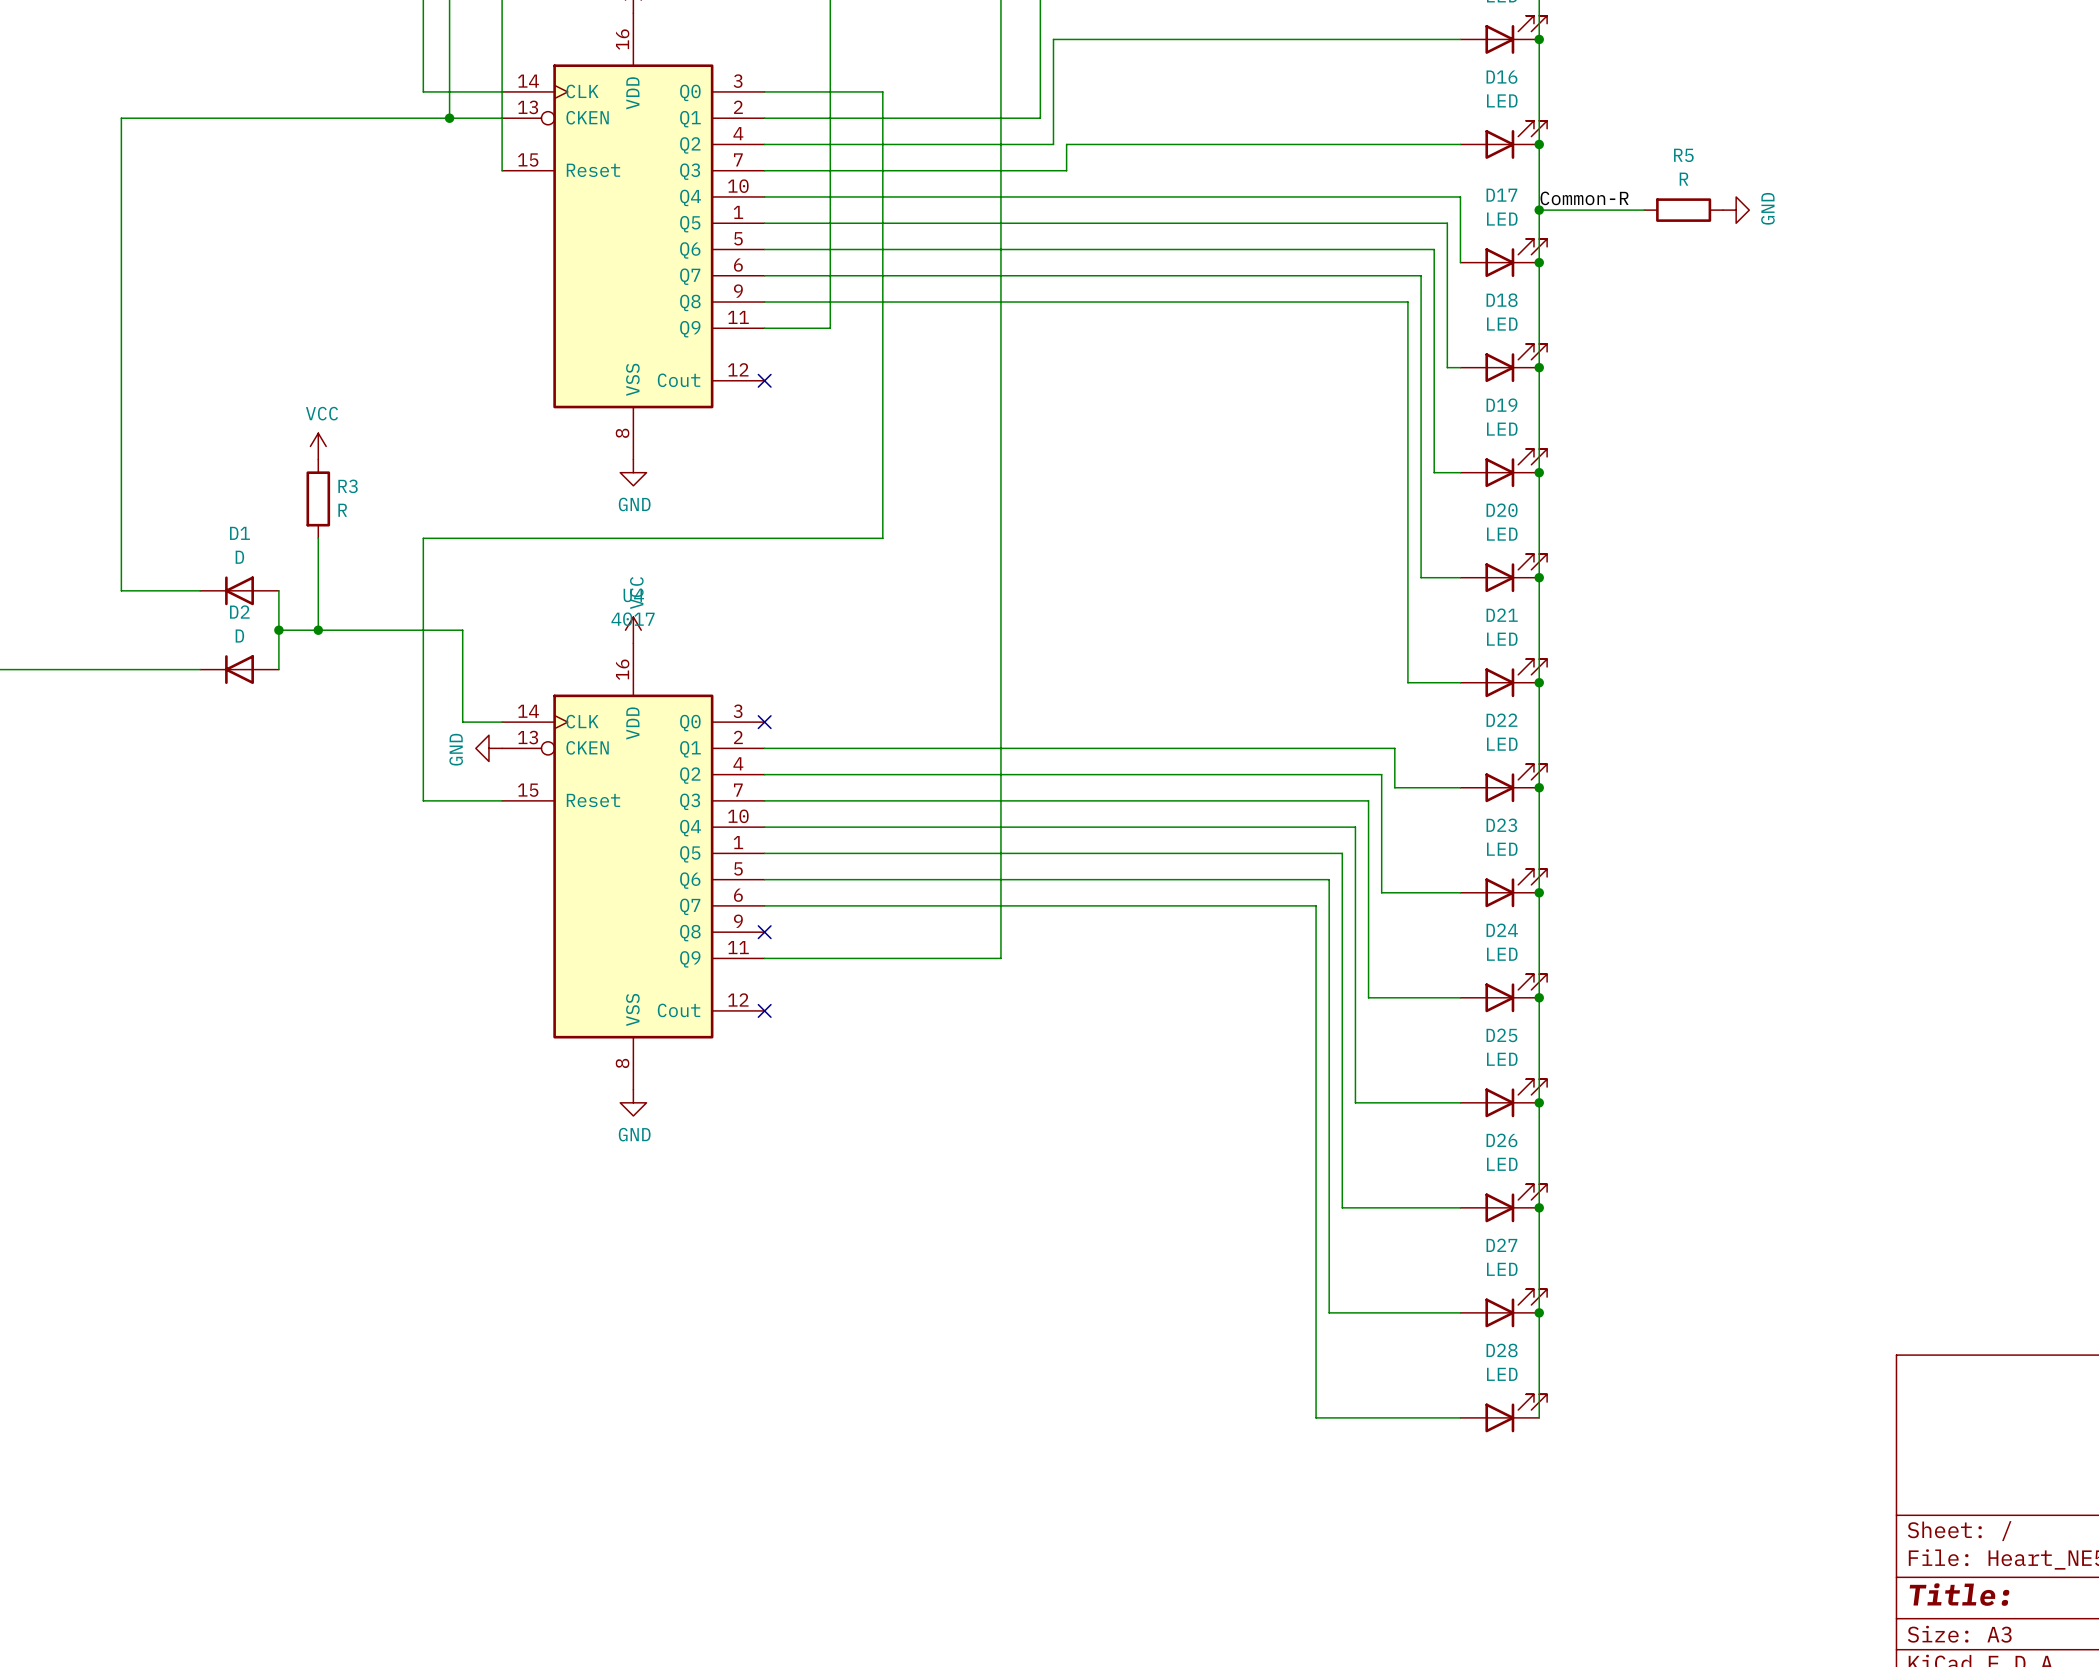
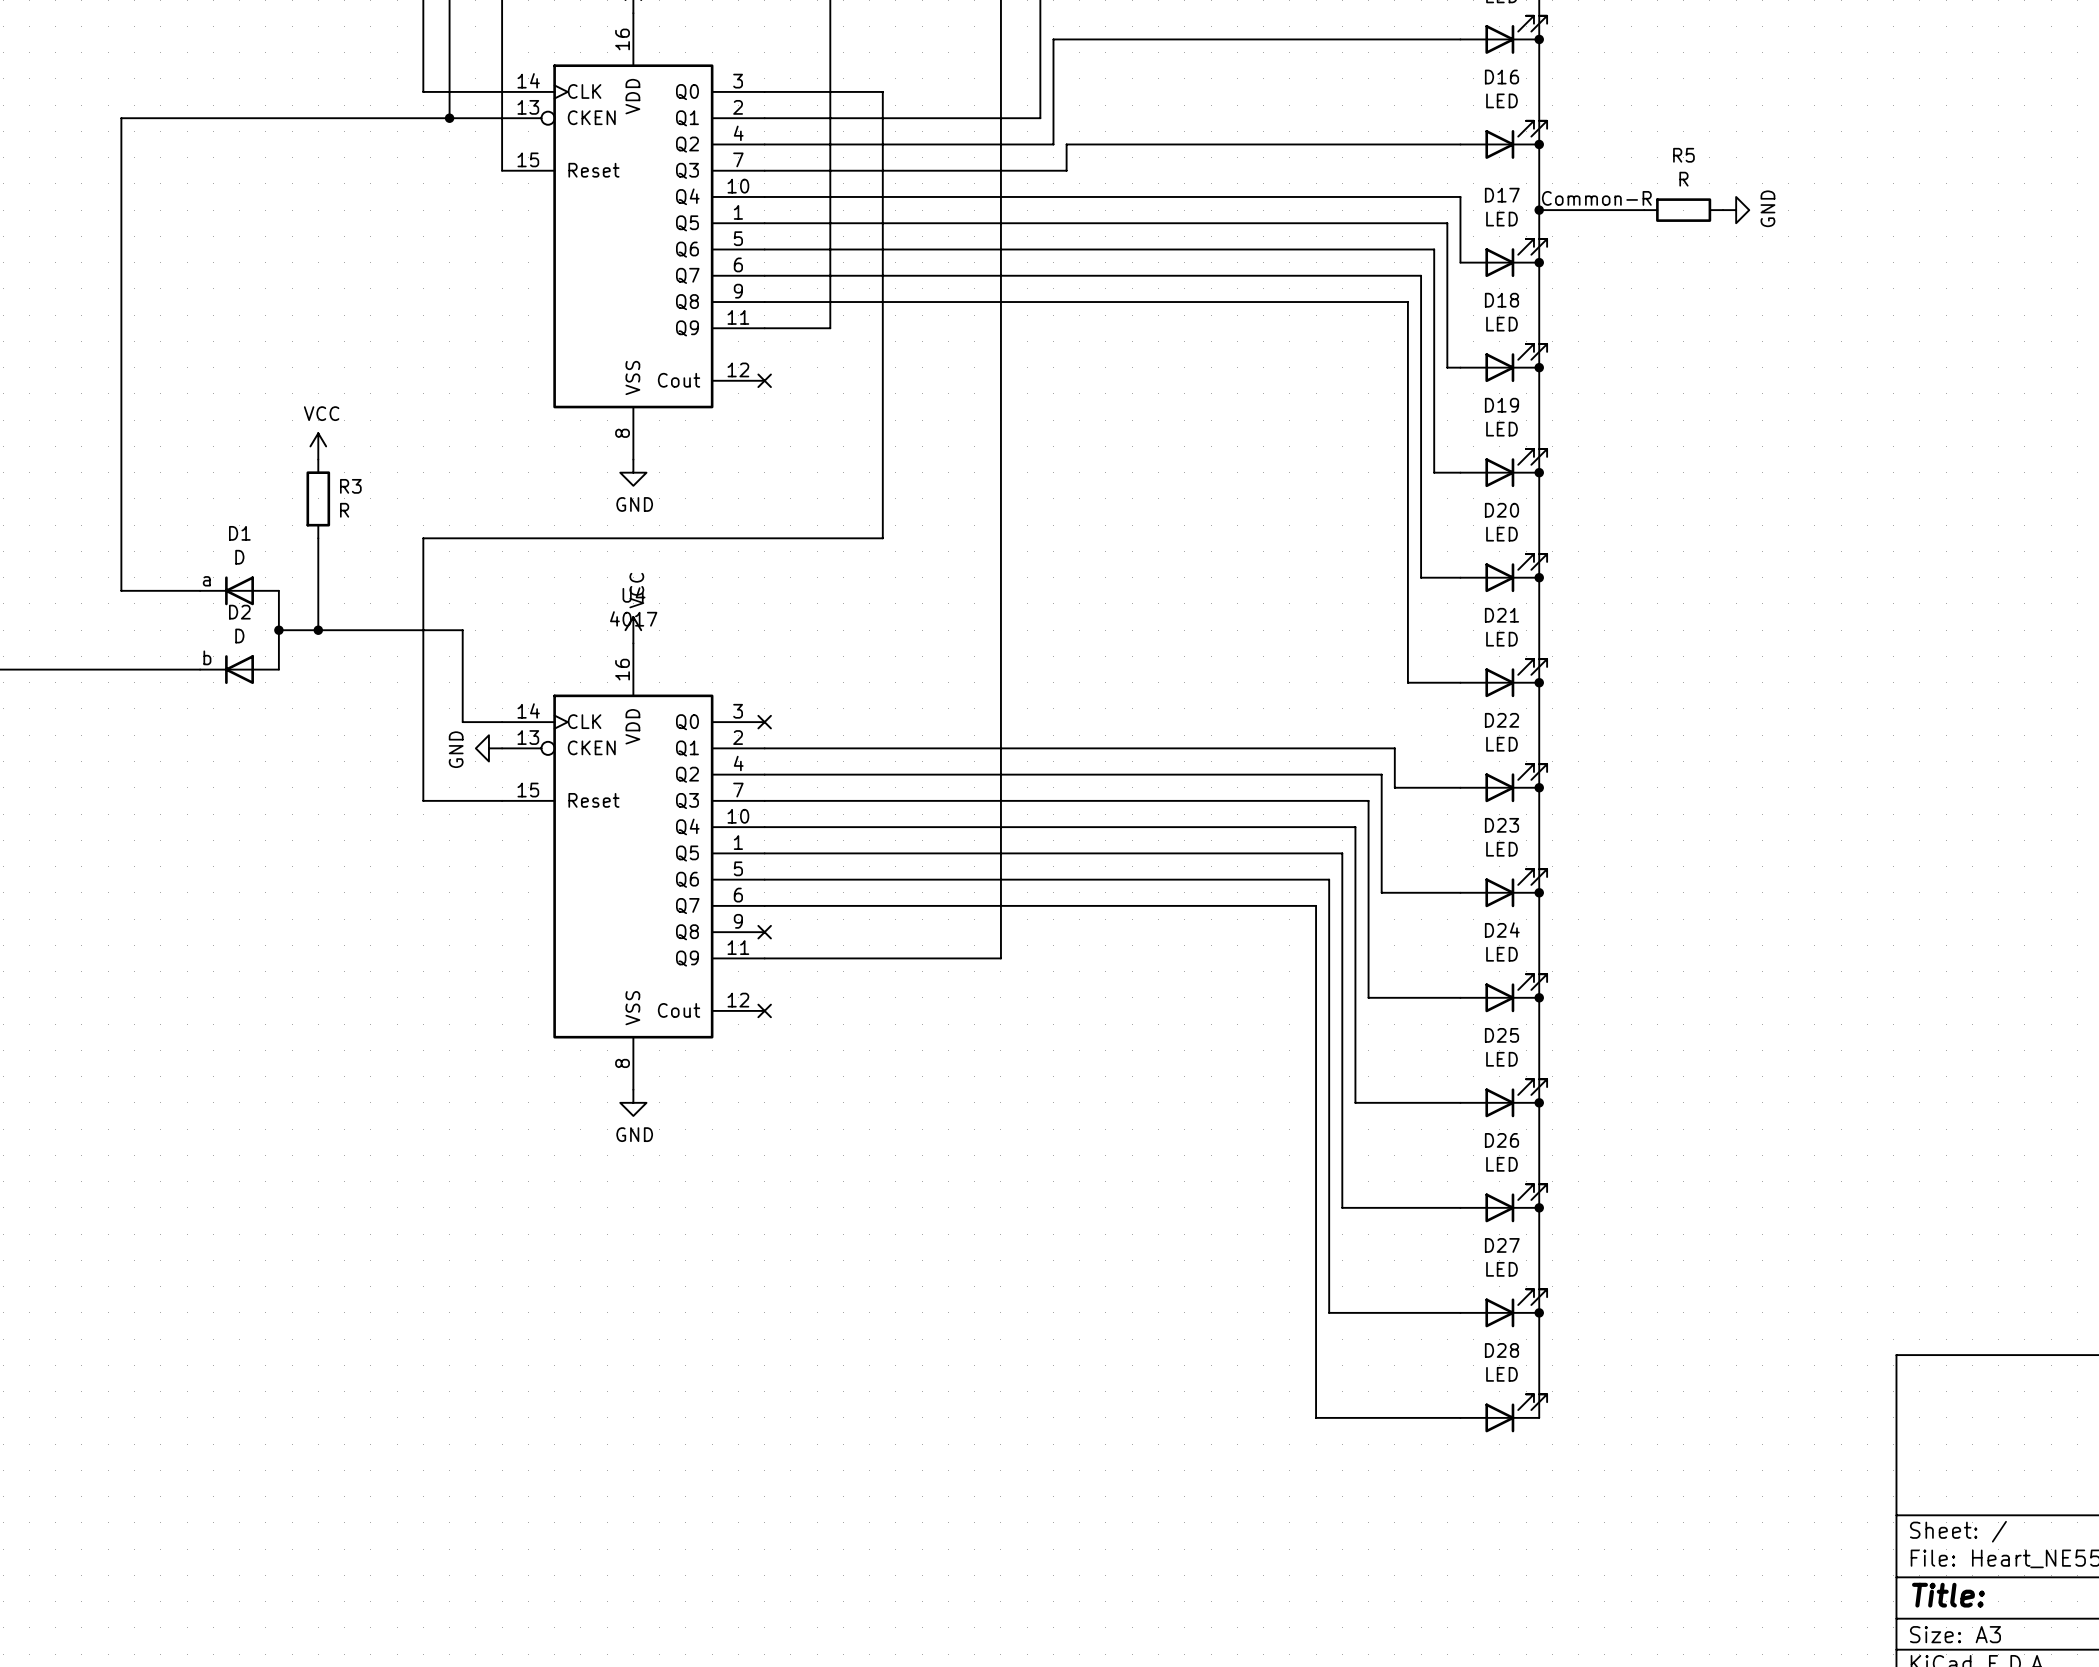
label: none -> a (206, 581)
label: none -> b (207, 657)

